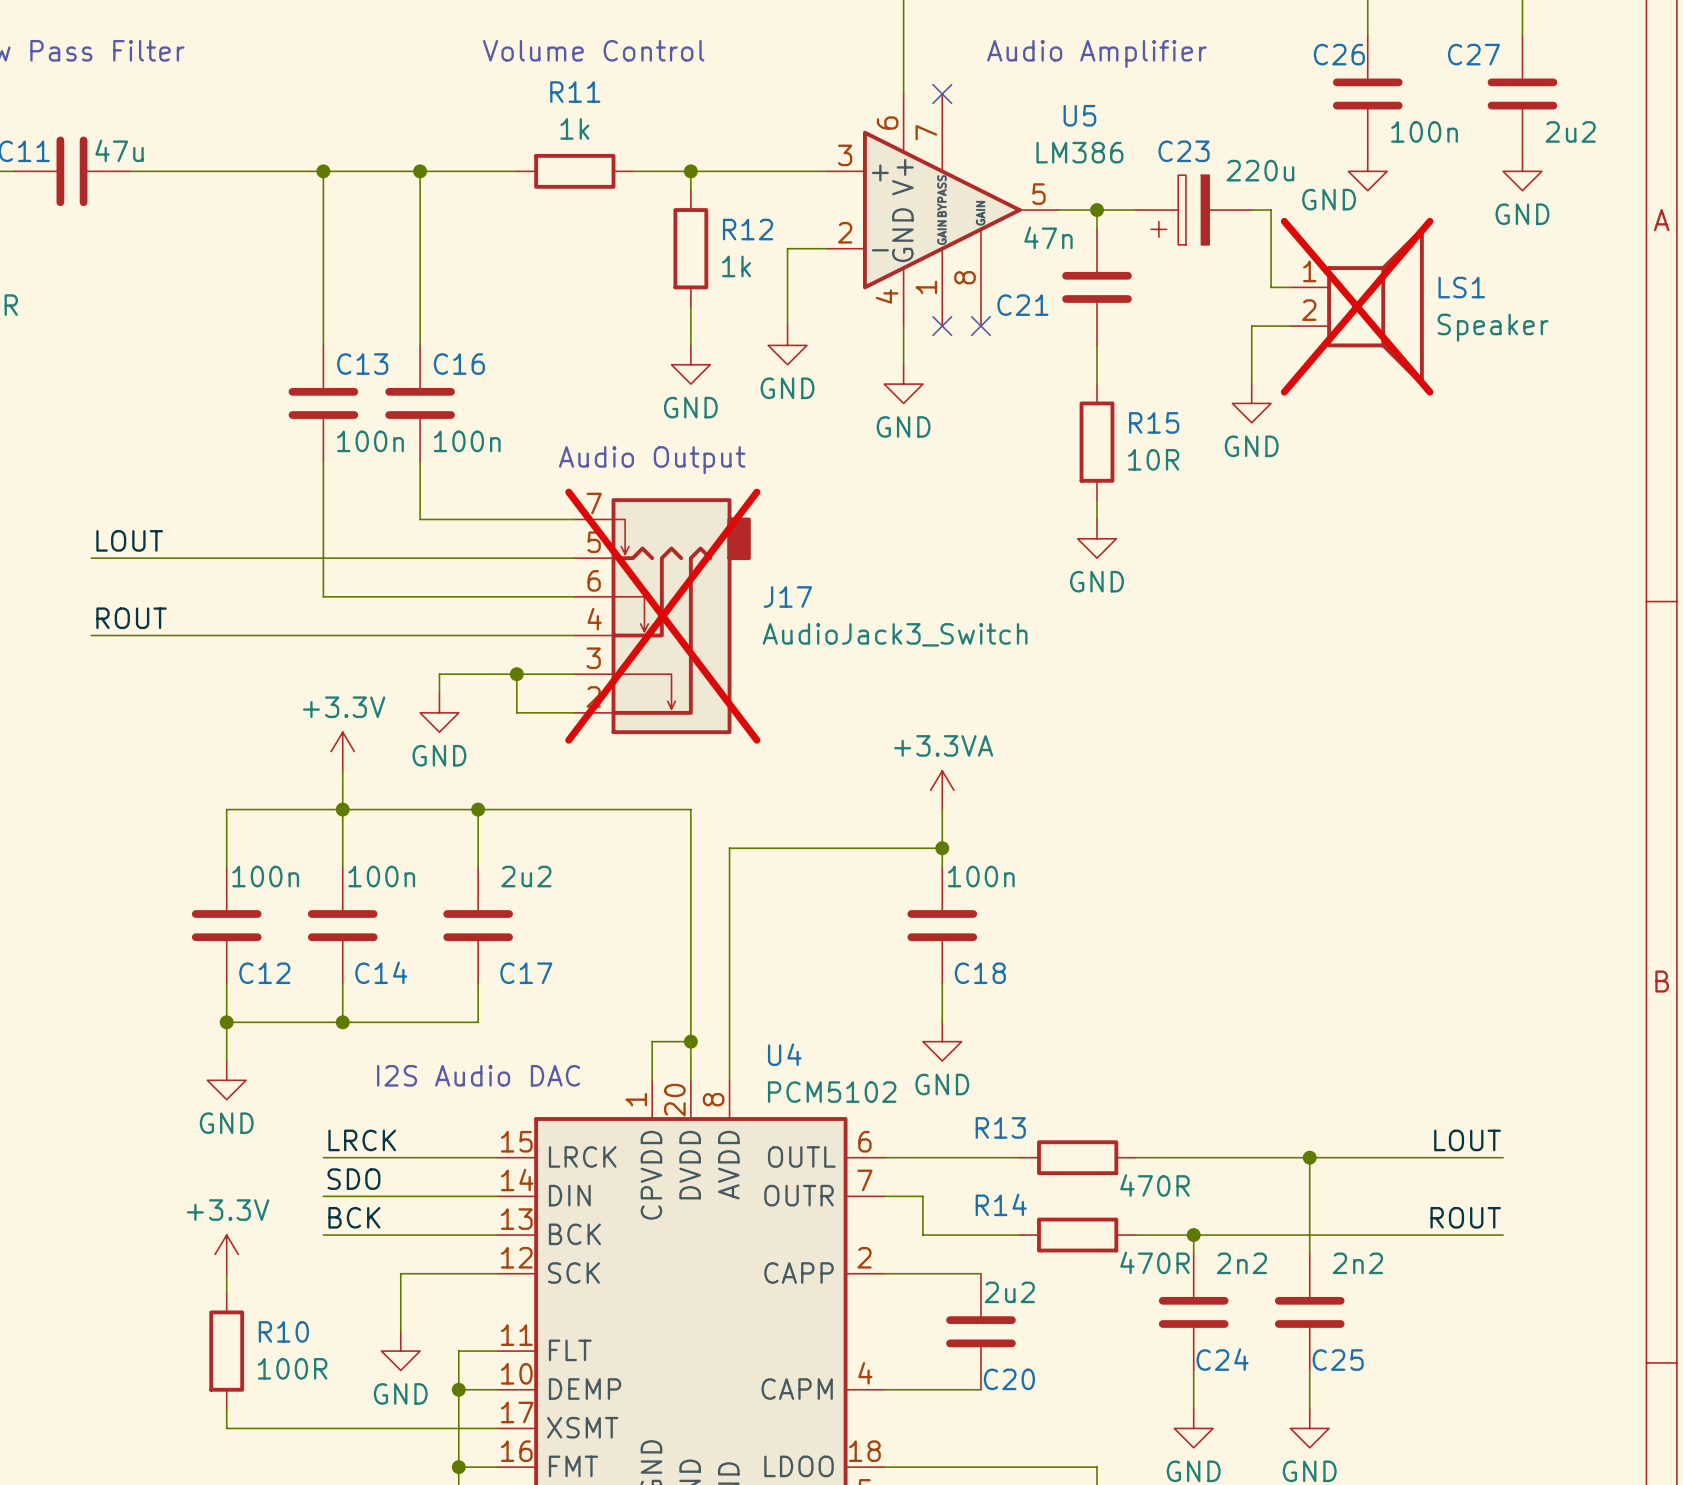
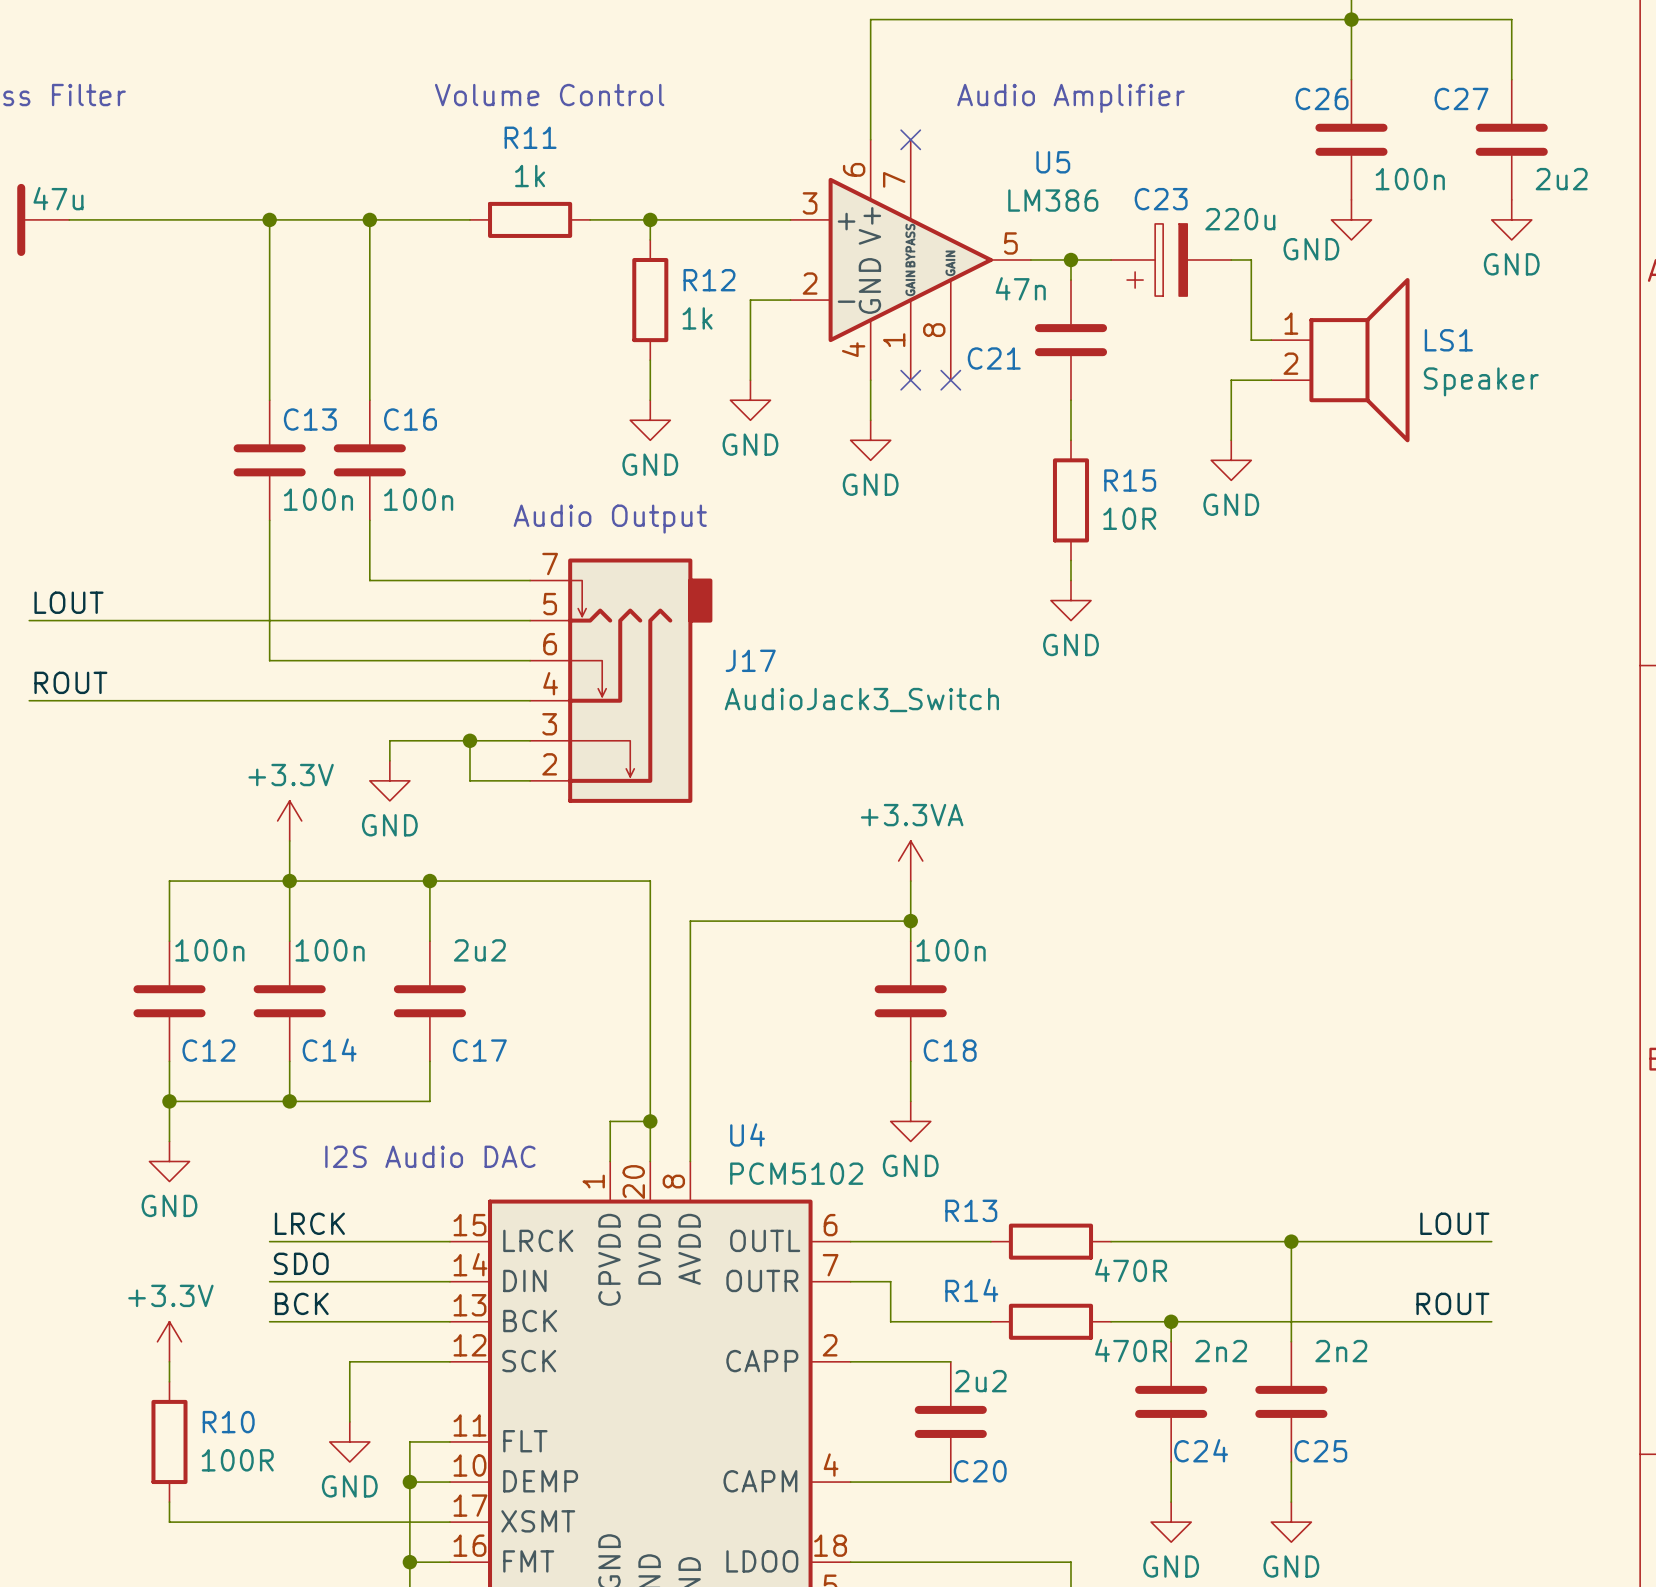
LS1 do-not-place cross: (1357, 306) -> none
J17 do-not-place cross: (662, 616) -> none

